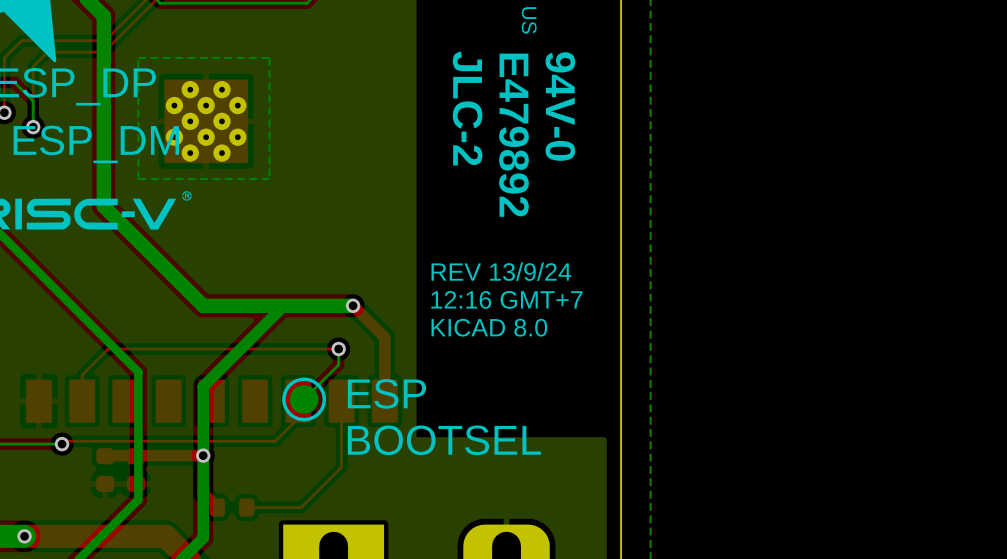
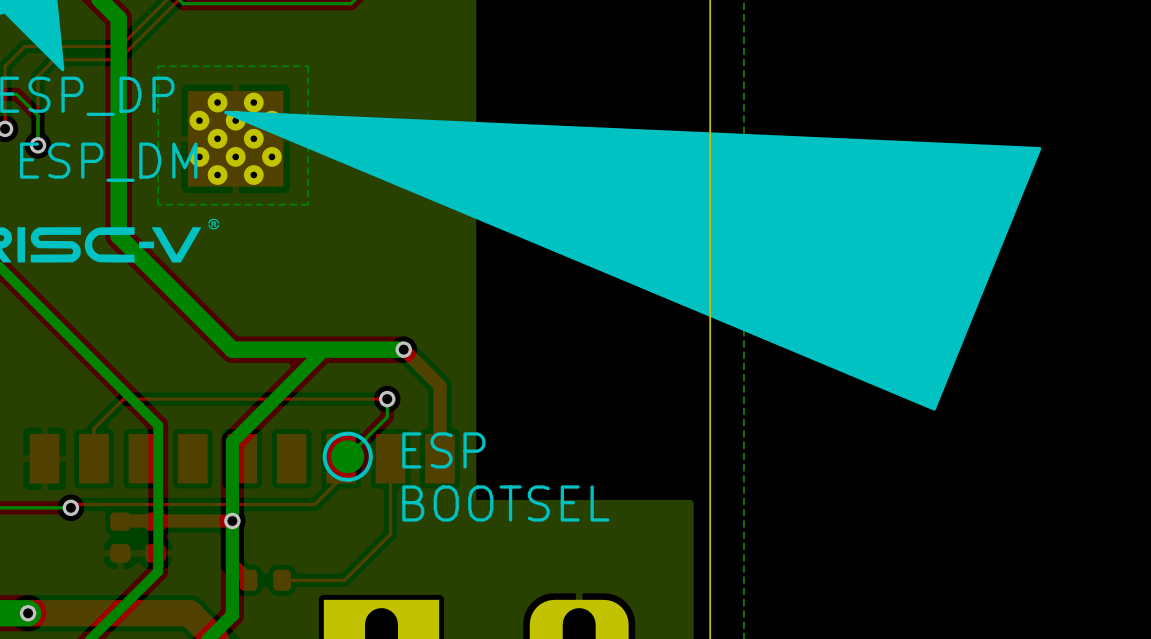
text: US (529, 20) -> none
drawing: none -> [224, 110, 1042, 411]
text: 94V-0 (560, 106) -> none
text: JLC-2 (467, 108) -> none
text: E479892 (513, 135) -> none
text: REV 13/9/24 (501, 271) -> none
text: 12:16 GMT+7 (506, 299) -> none
text: KICAD 8.0 (489, 327) -> none

